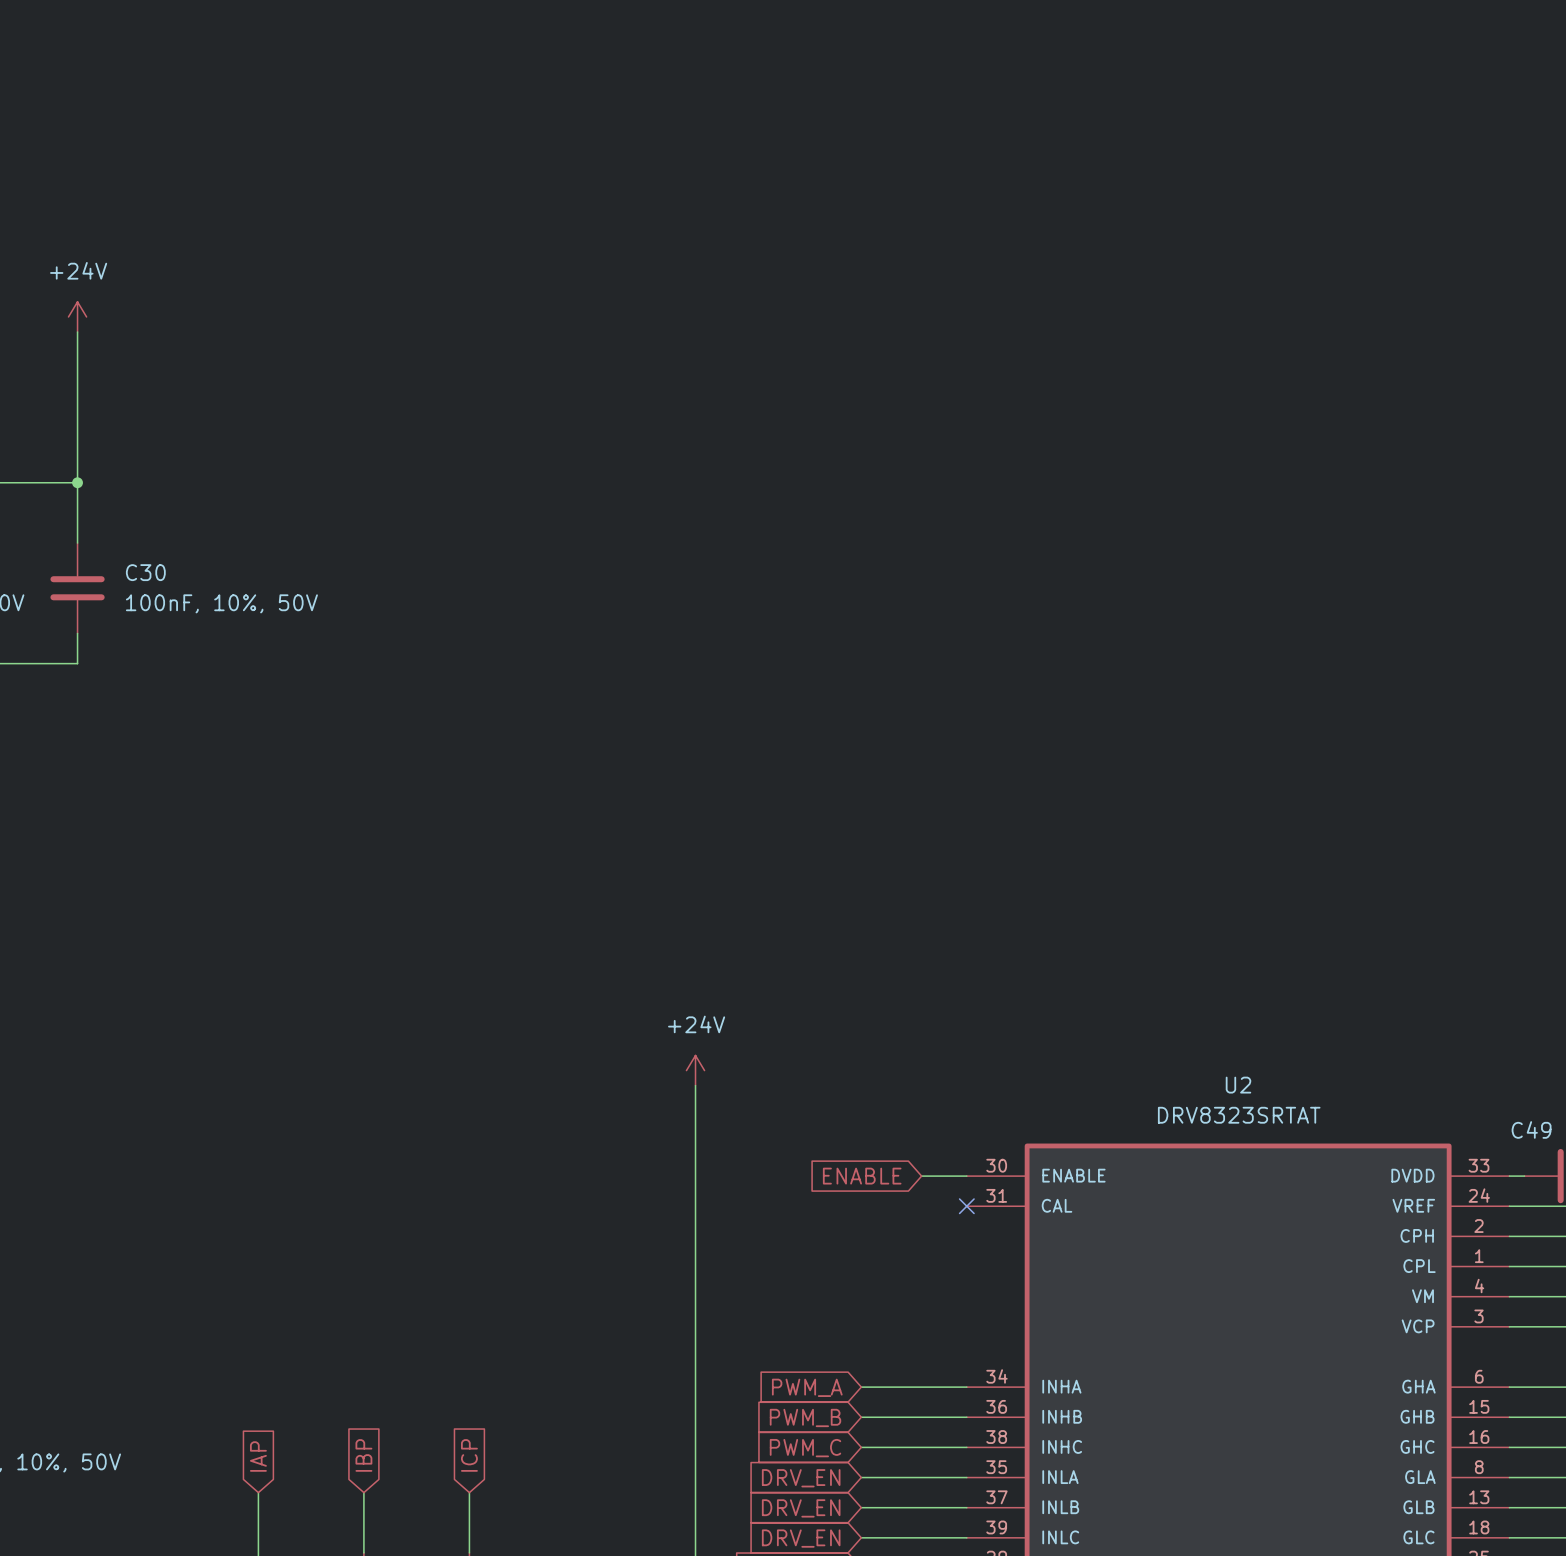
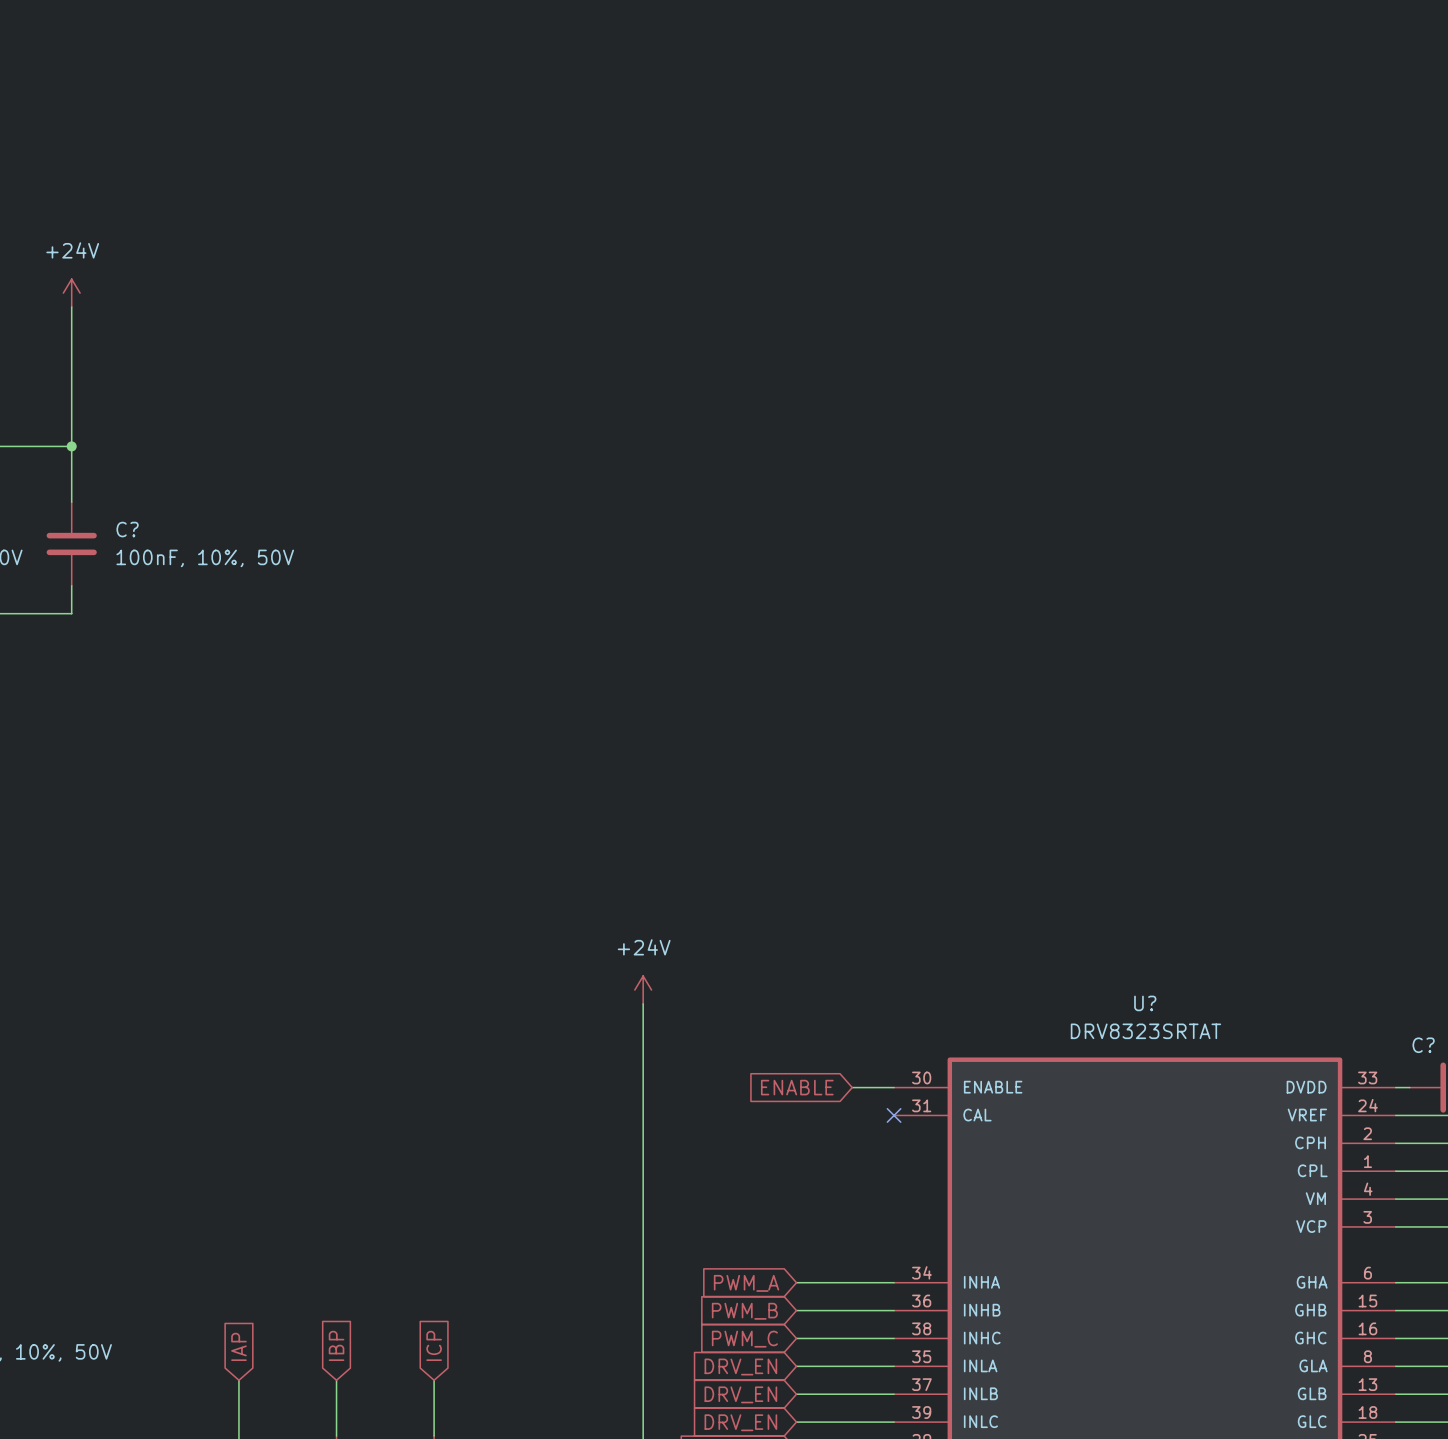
C30 name: C30 (145, 572) -> C? (127, 529)
U2 name: U2 (1238, 1085) -> U? (1145, 1003)
C49 name: C49 (1531, 1129) -> C? (1423, 1045)

